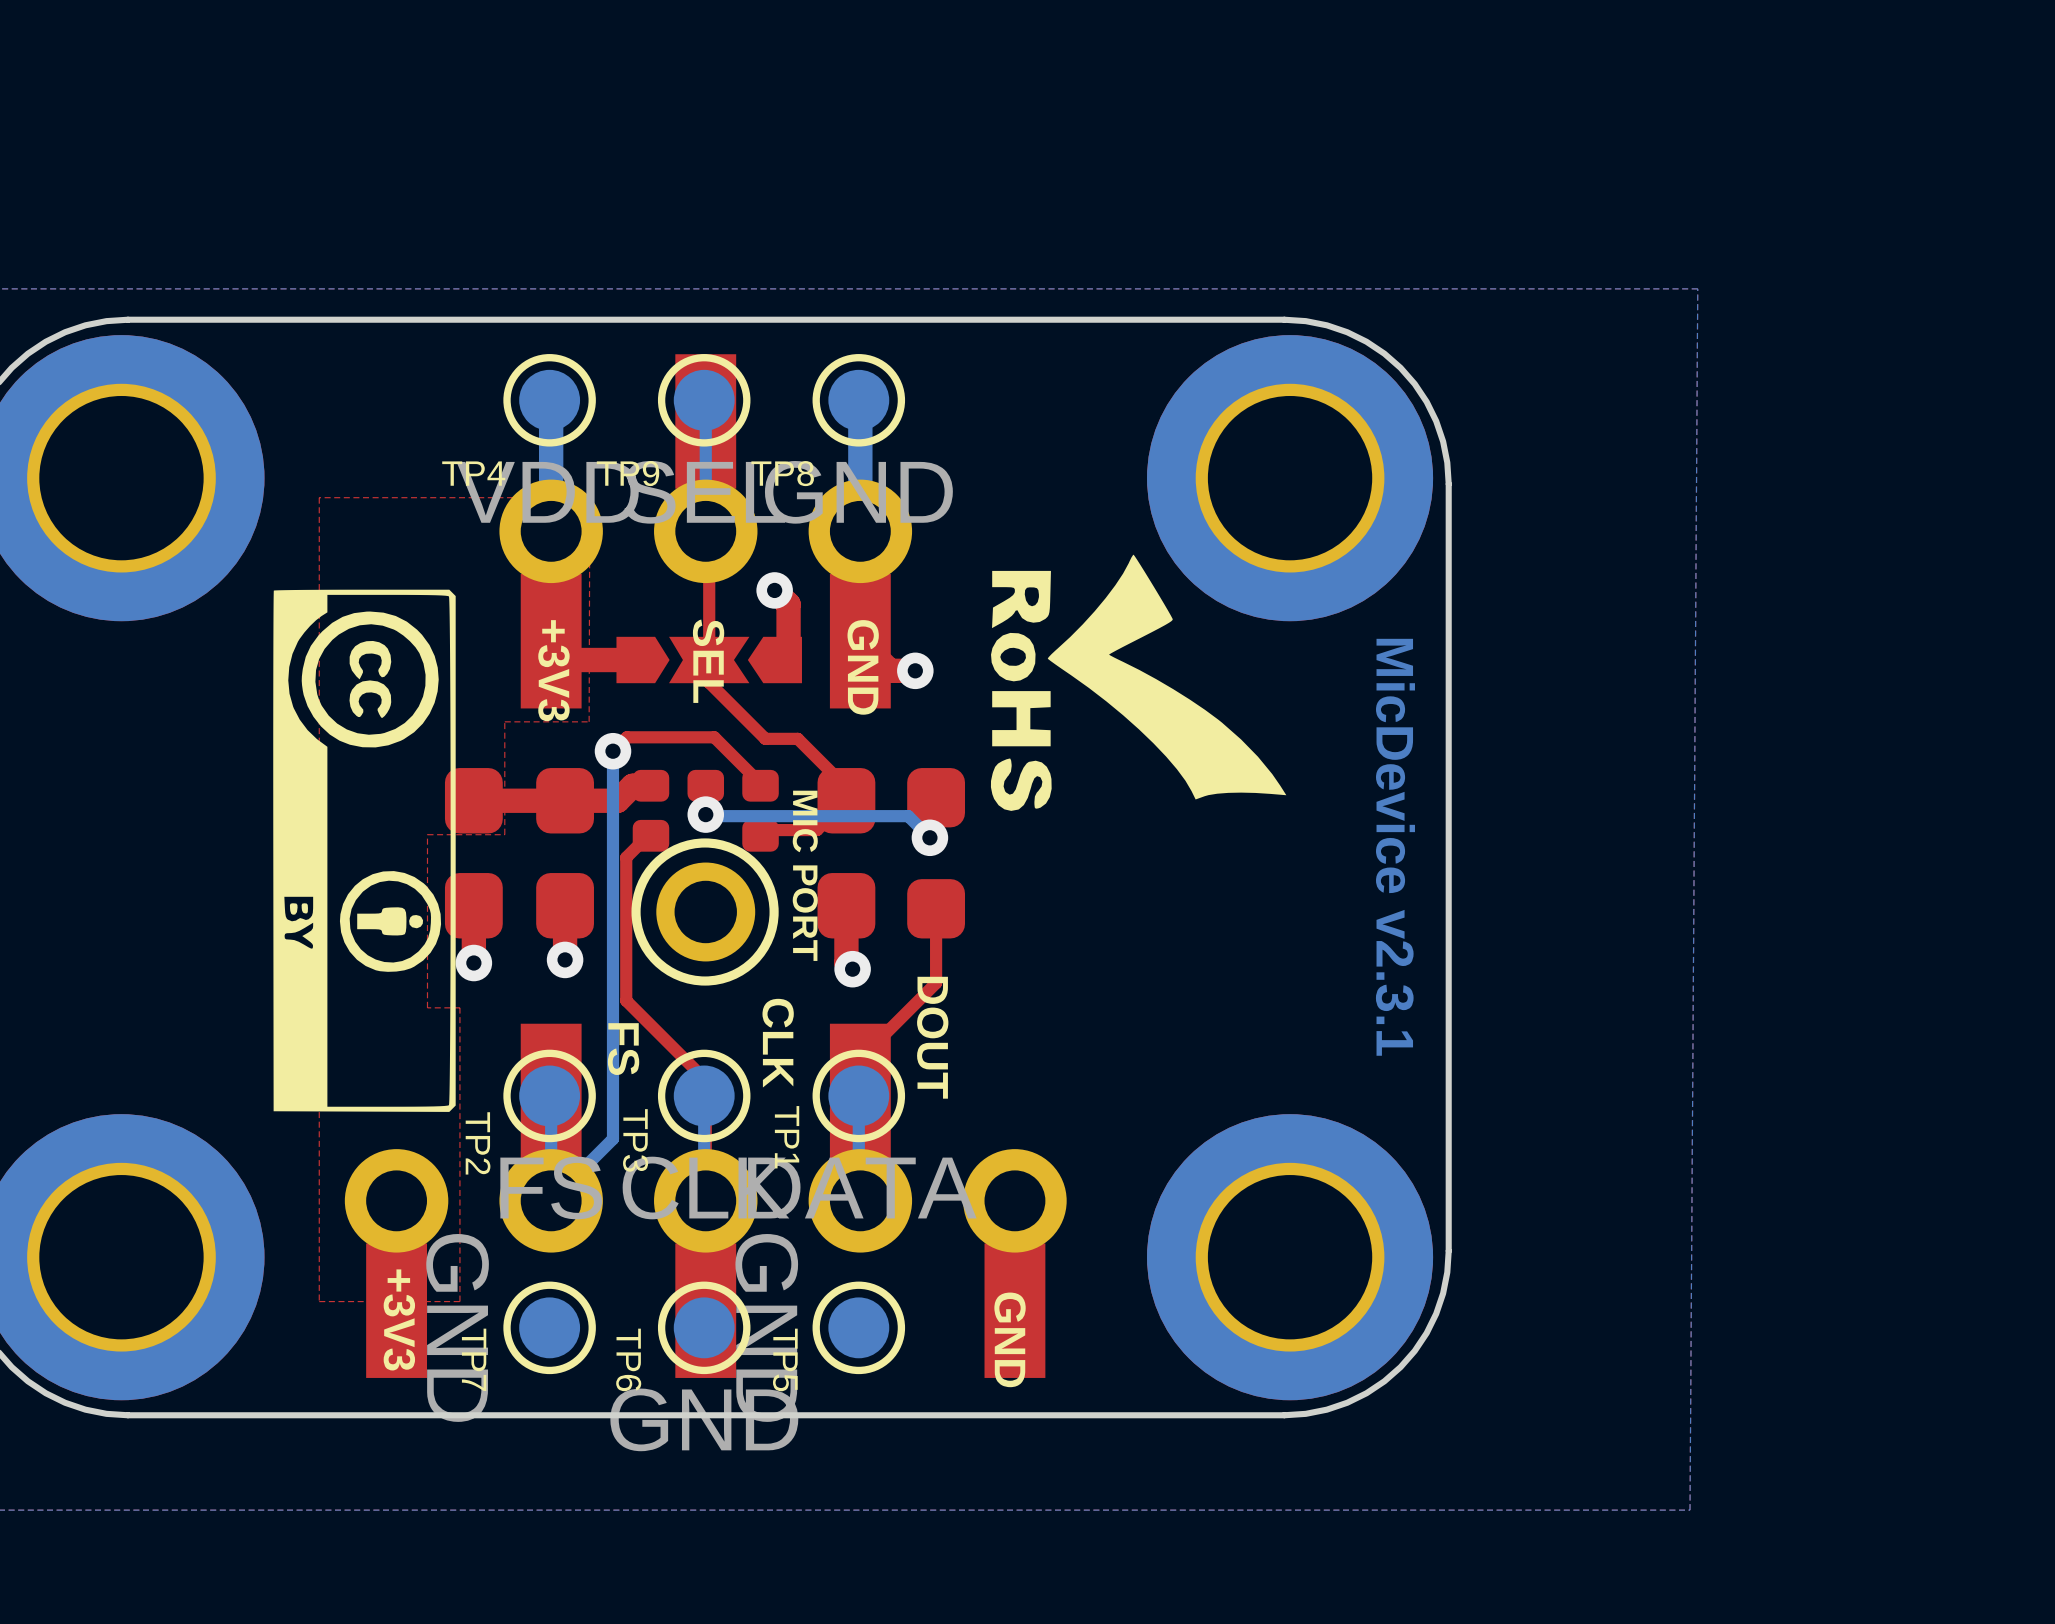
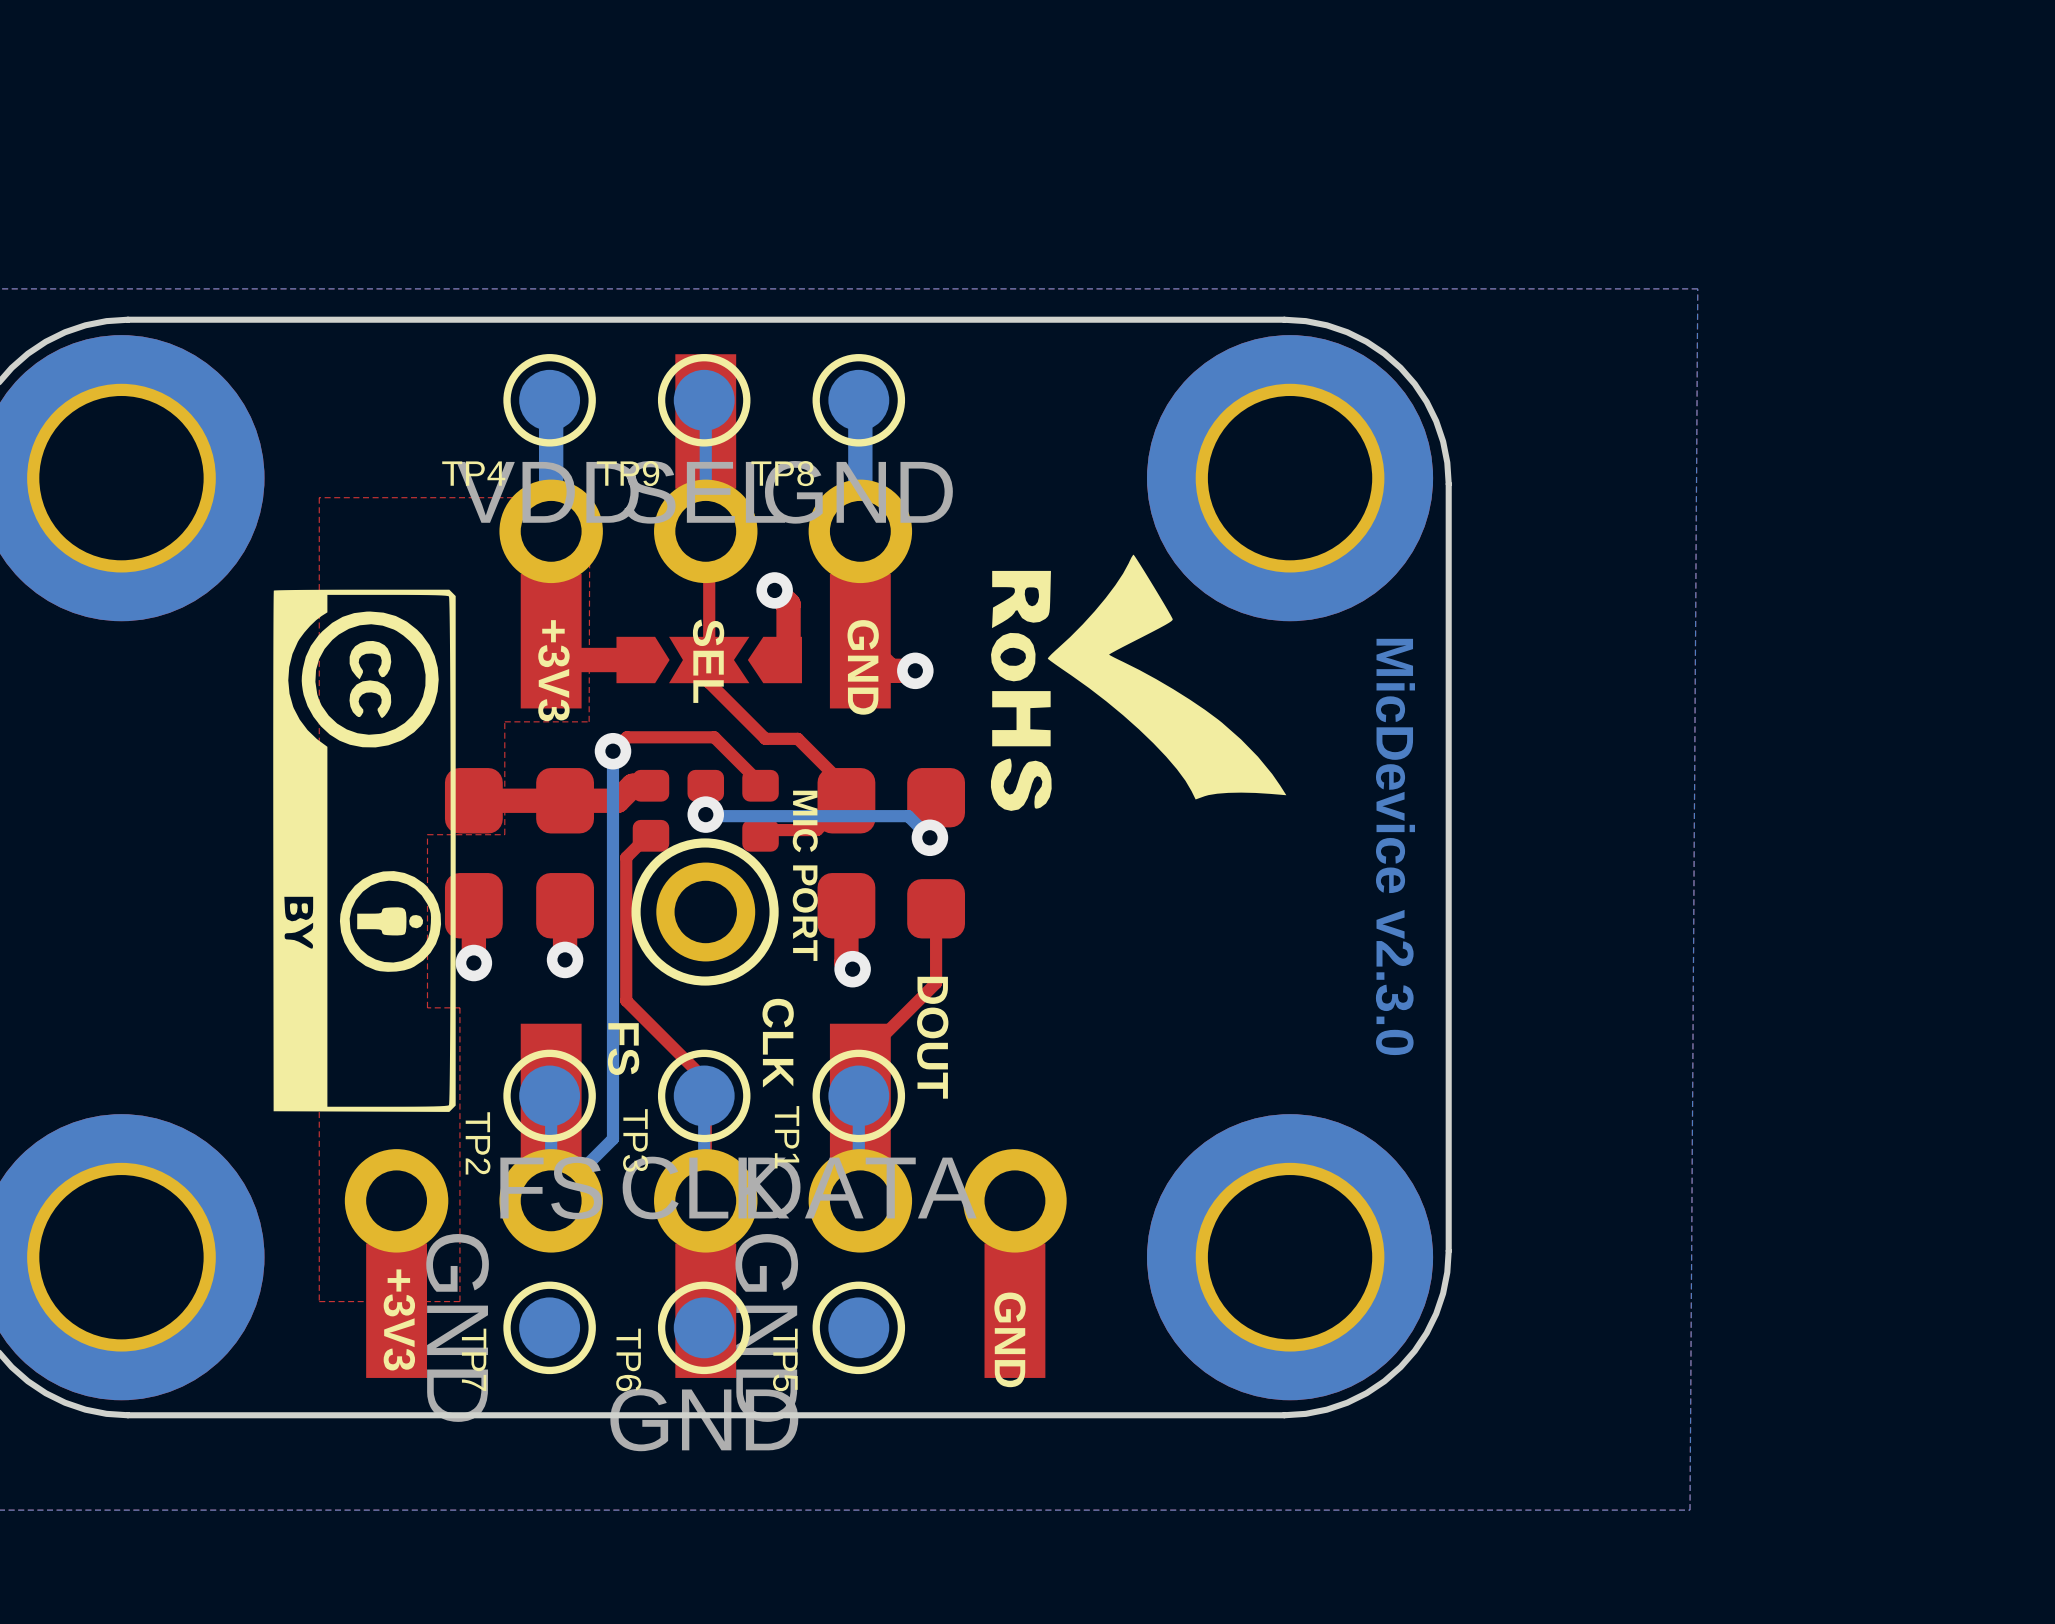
text: MicDevice v2.3.1 (1395, 847) -> MicDevice v2.3.0 (1395, 846)

